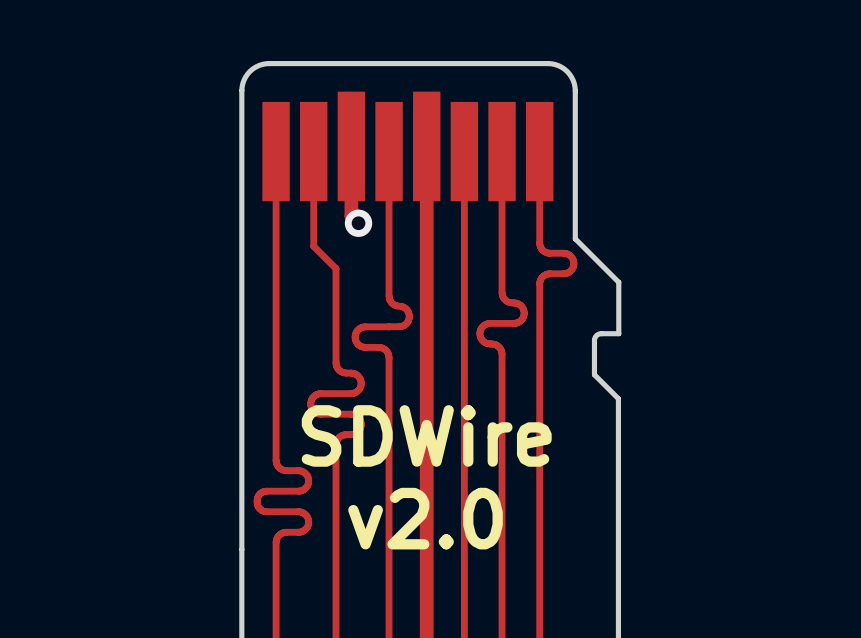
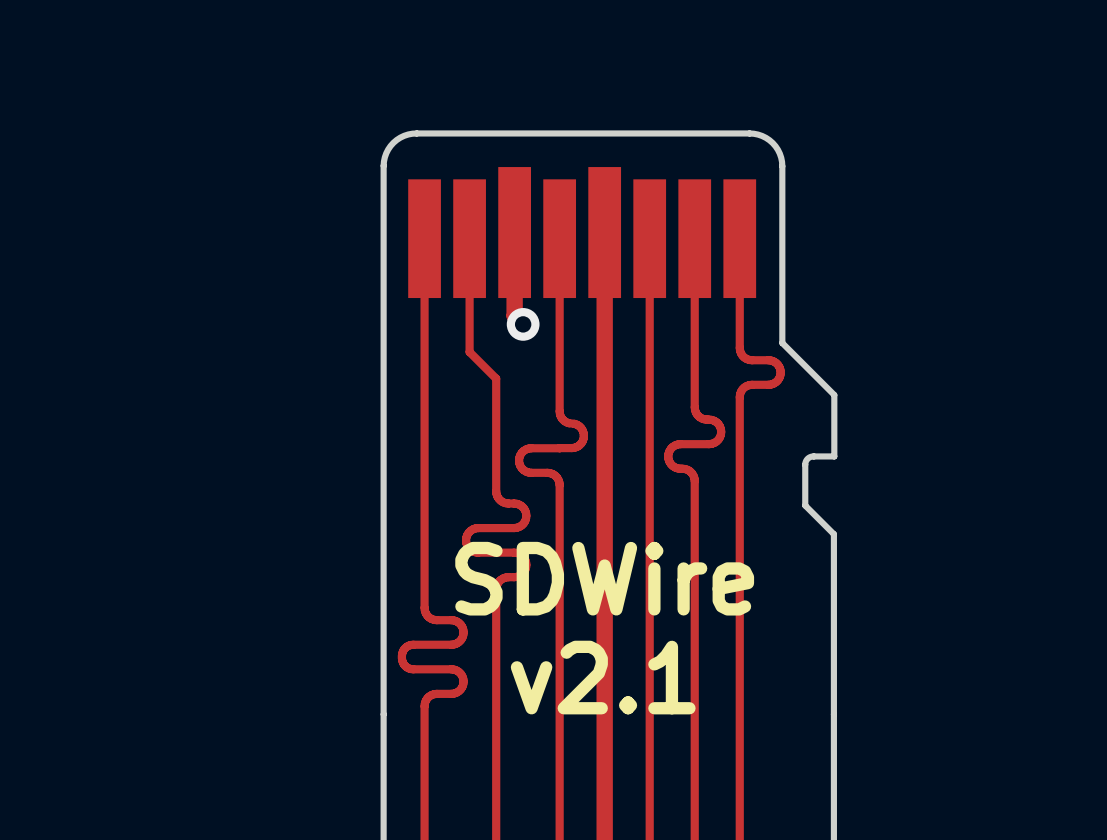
text: v2.0 (425, 518) -> v2.1 (603, 677)

